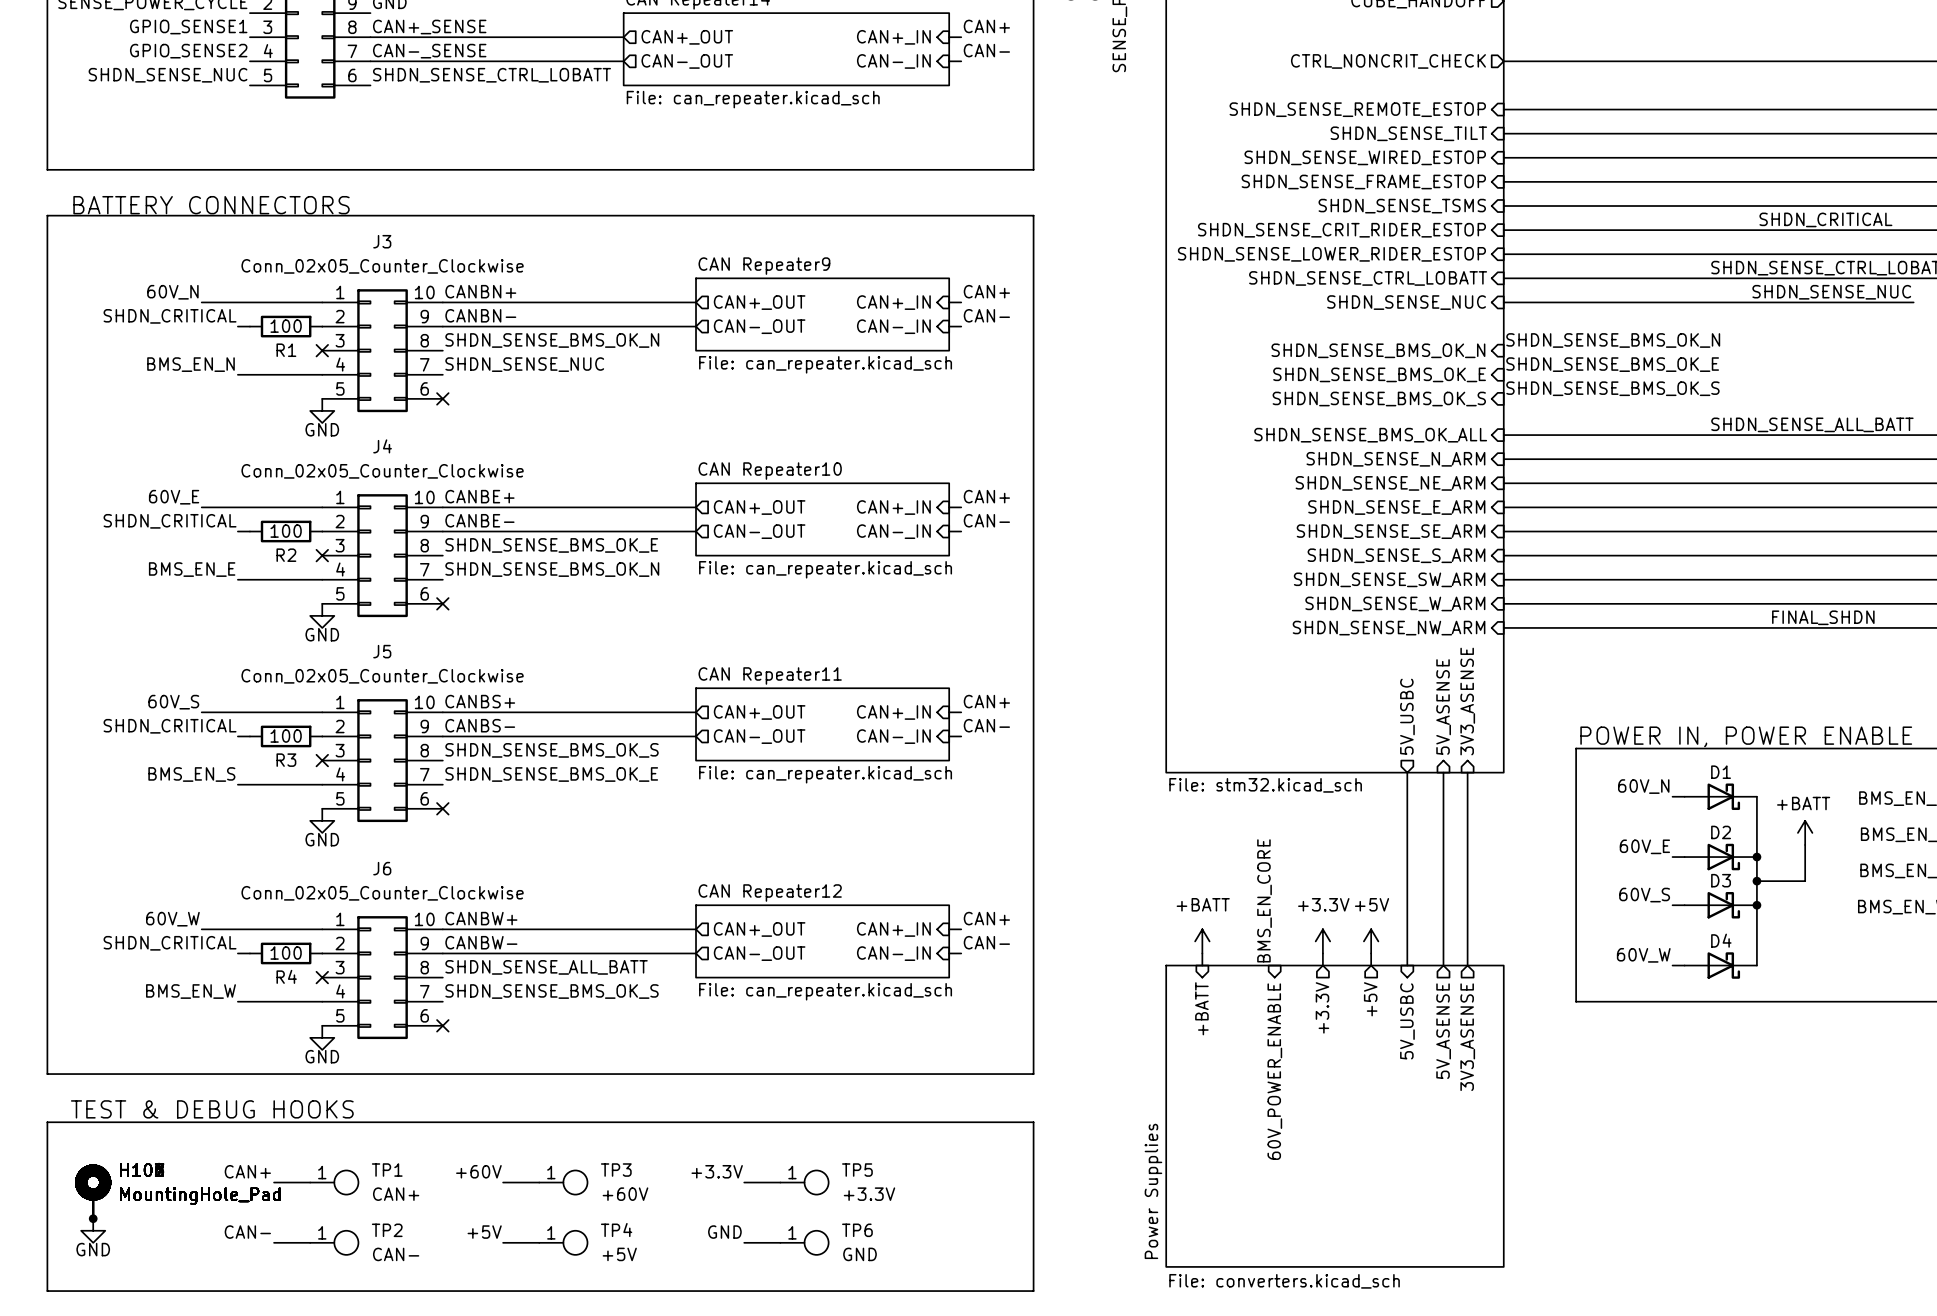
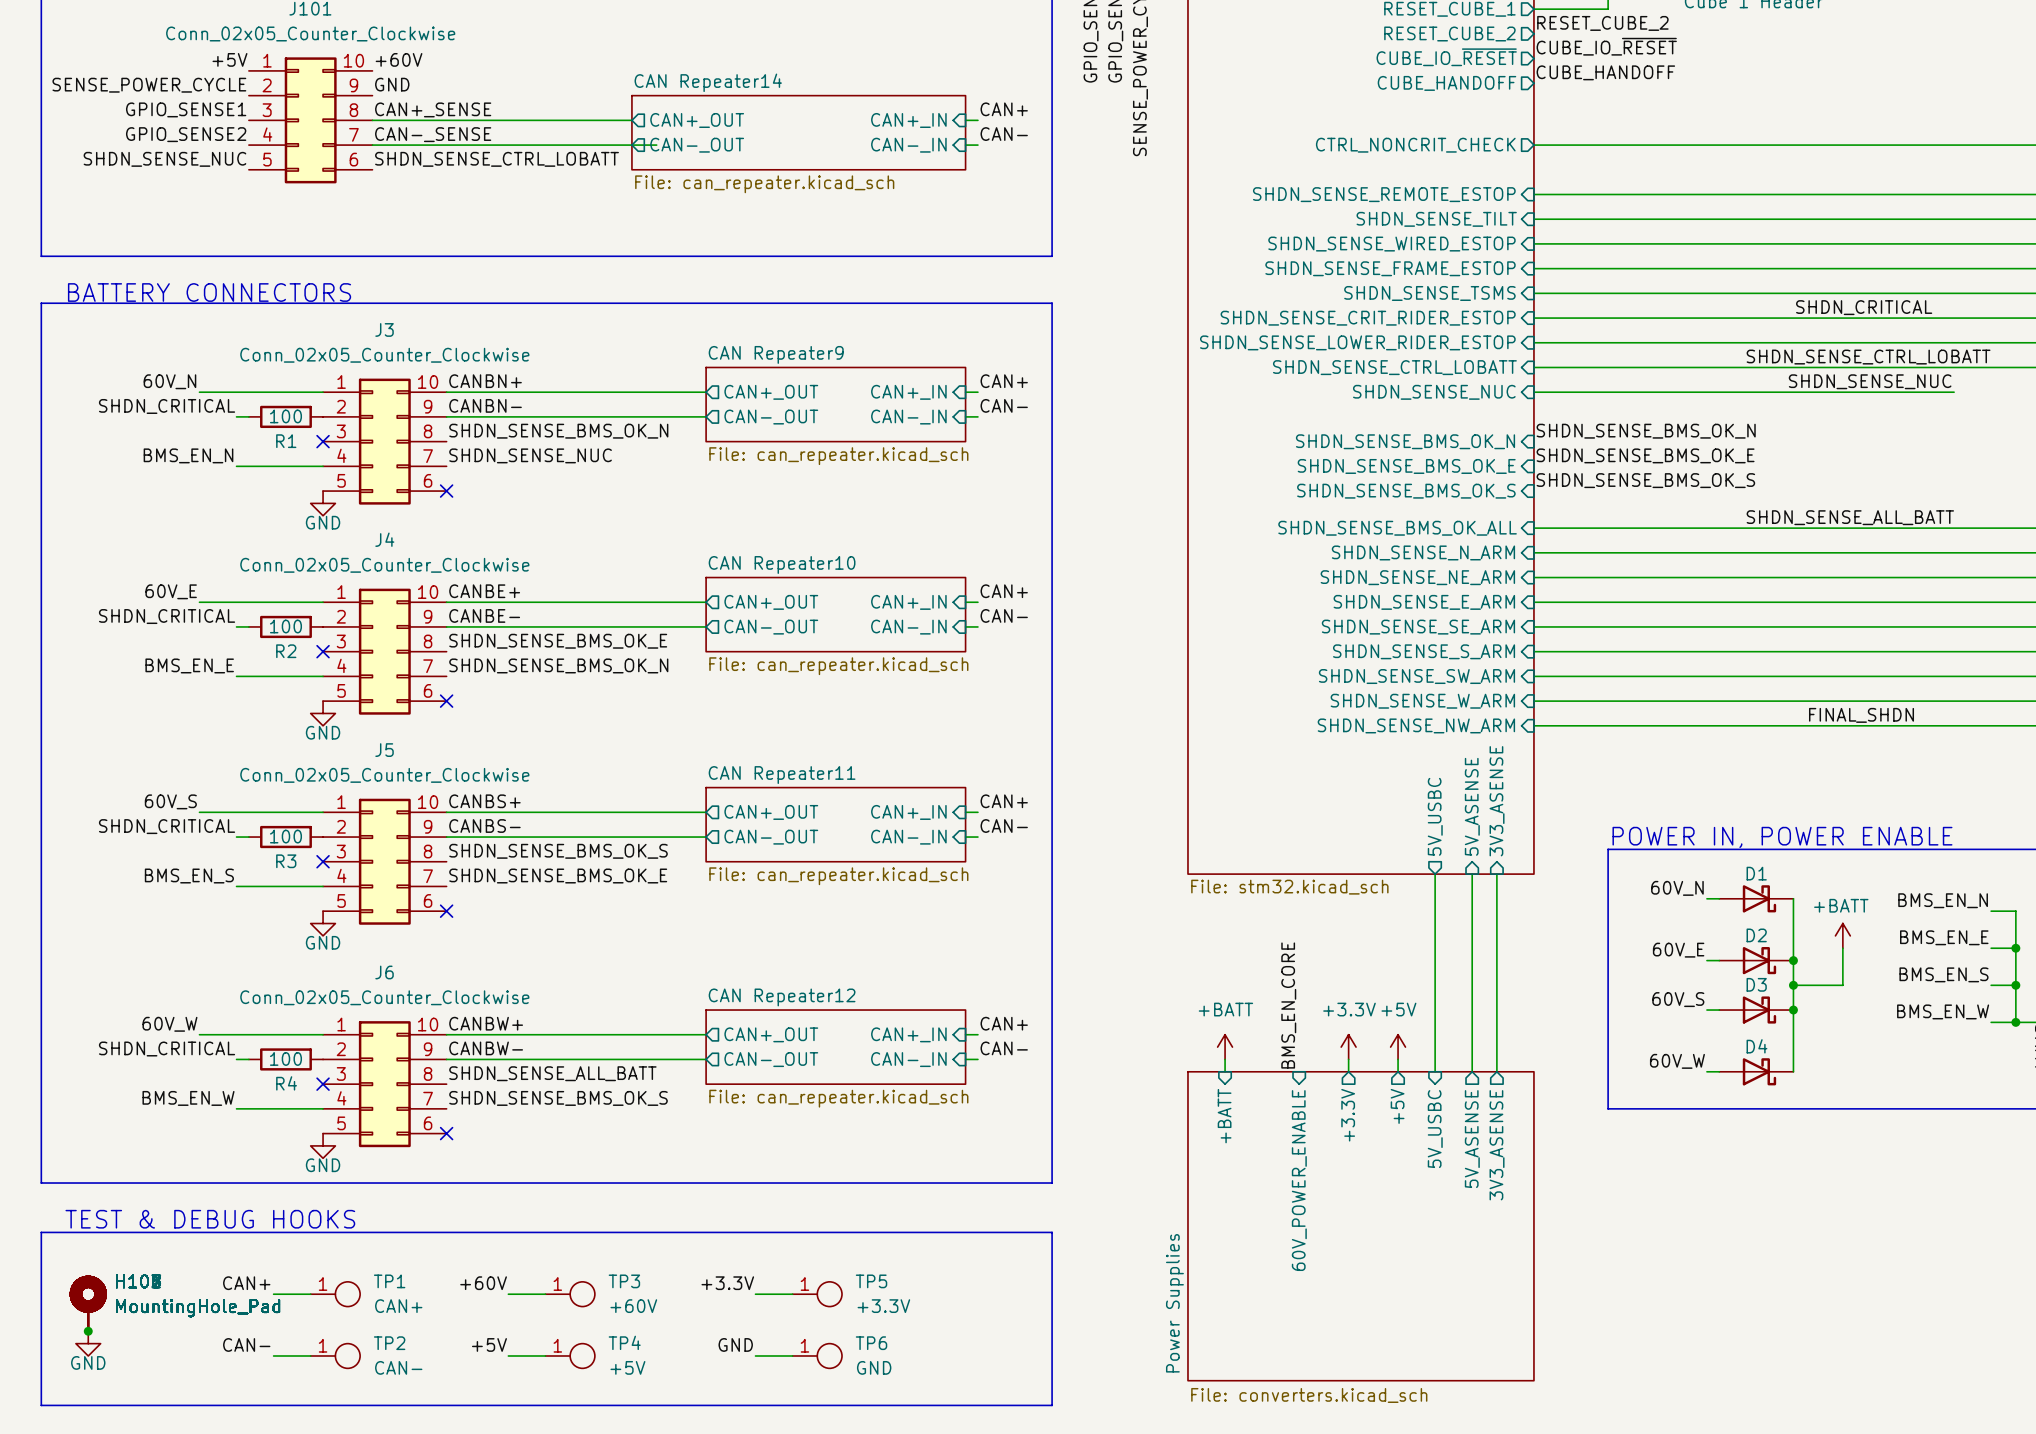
wire: none -> (631, 145) (656, 145)

